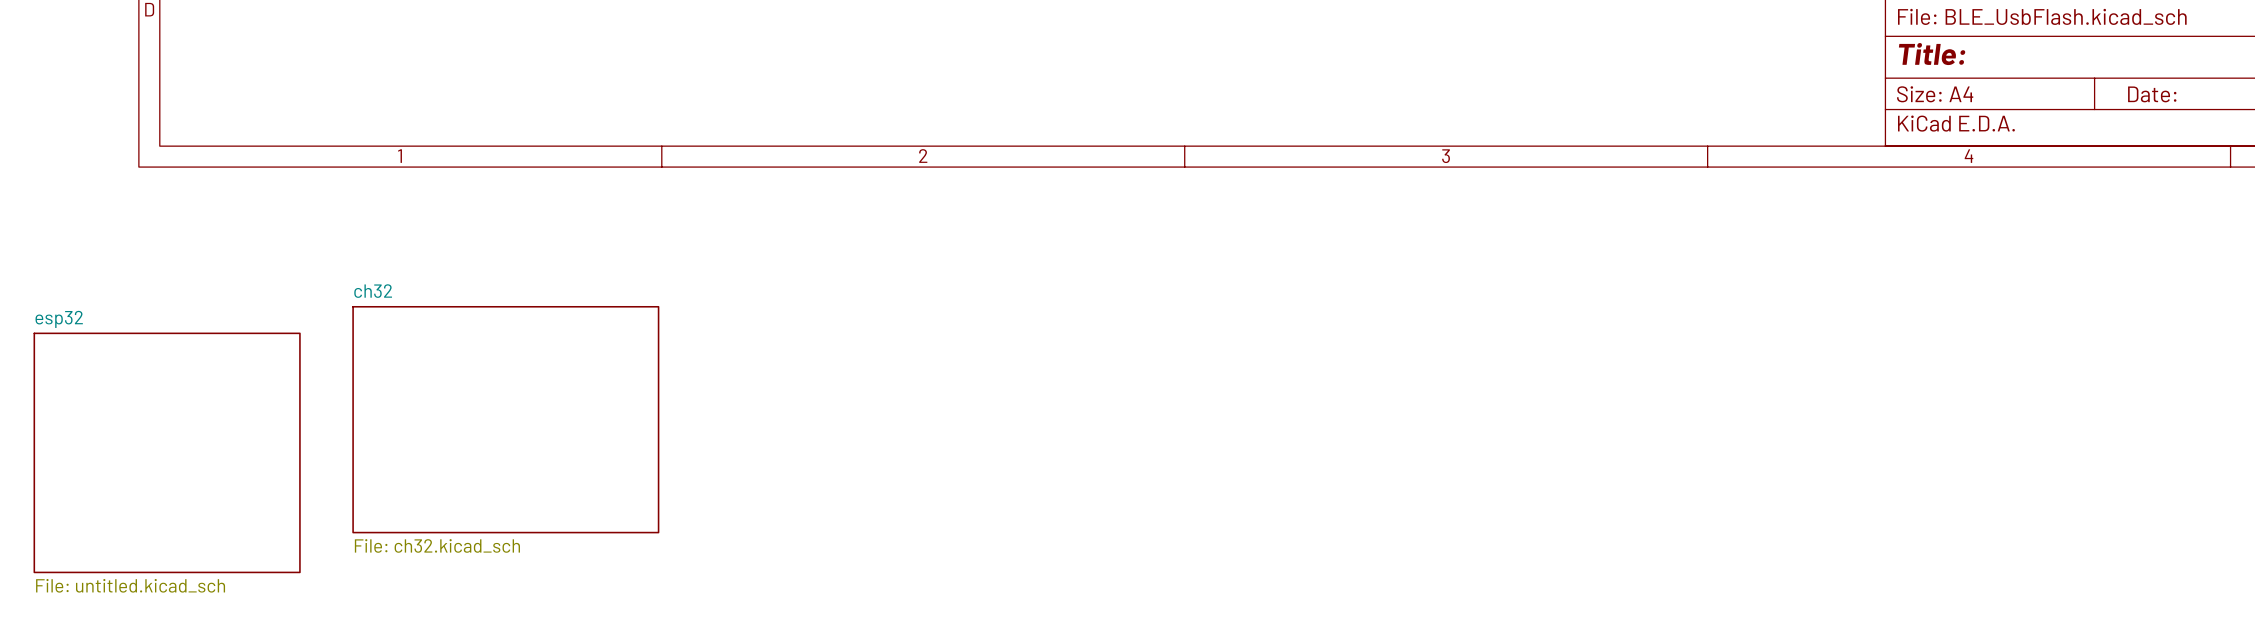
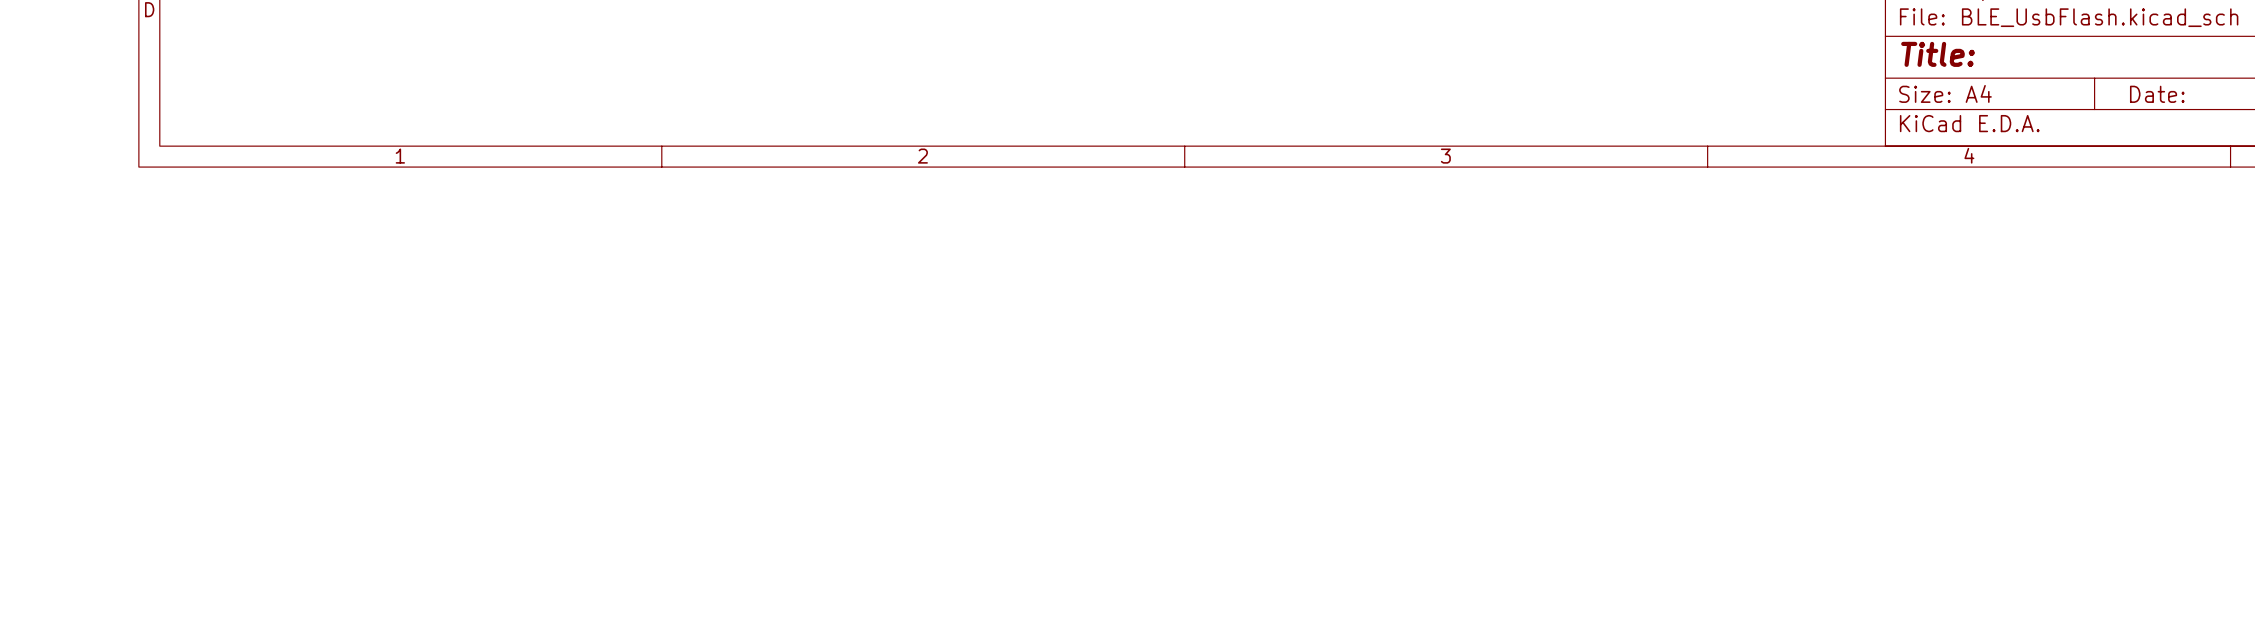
sheet ch32: File: ch32.kicad_sch (505, 419) -> none
sheet esp32: File: untitled.kicad_sch (167, 452) -> none

